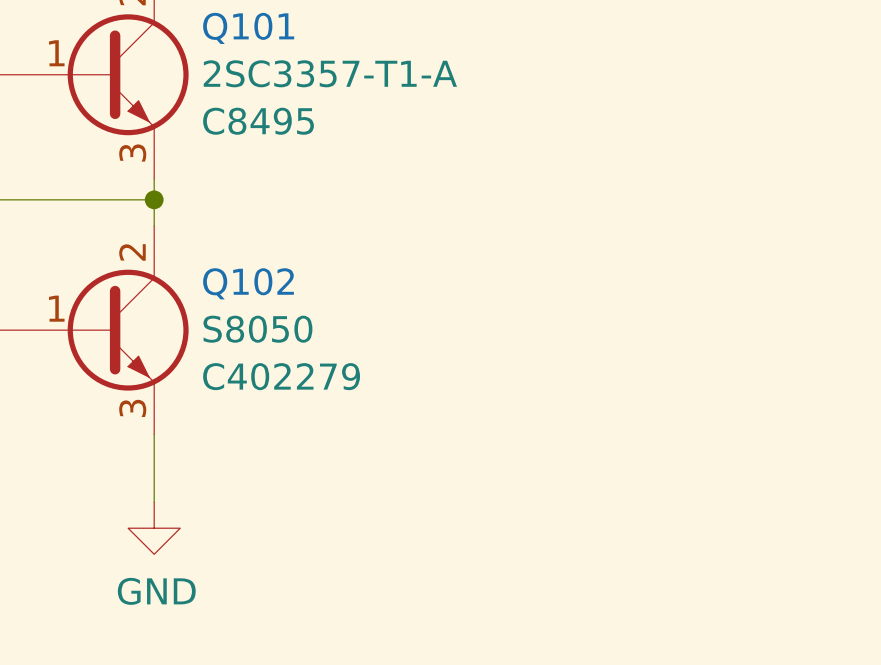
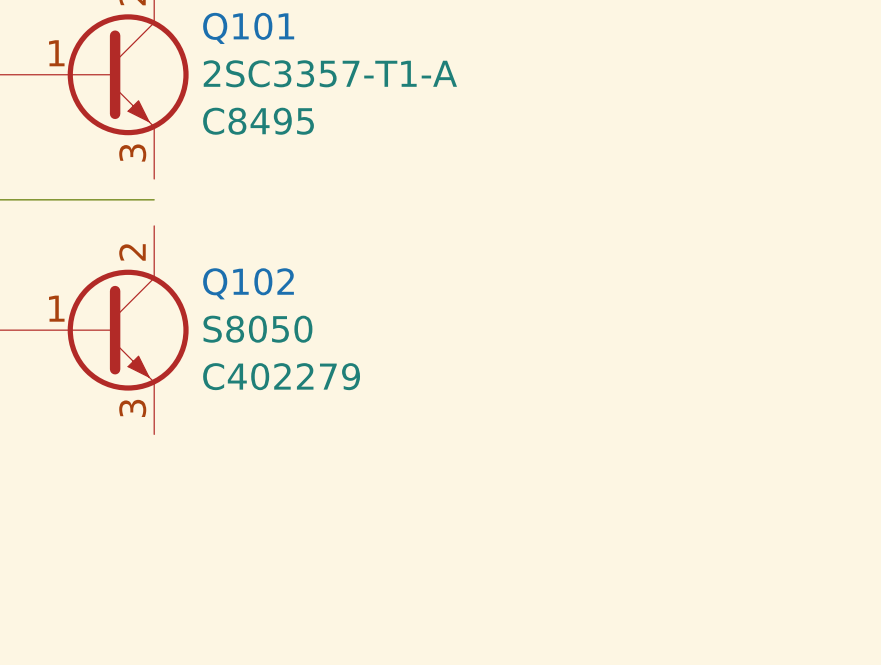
wire: (154, 179) (154, 225) -> none
junction: (154, 199) -> none
wire: (154, 434) (154, 502) -> none
power symbol: GND (154, 528) -> none

